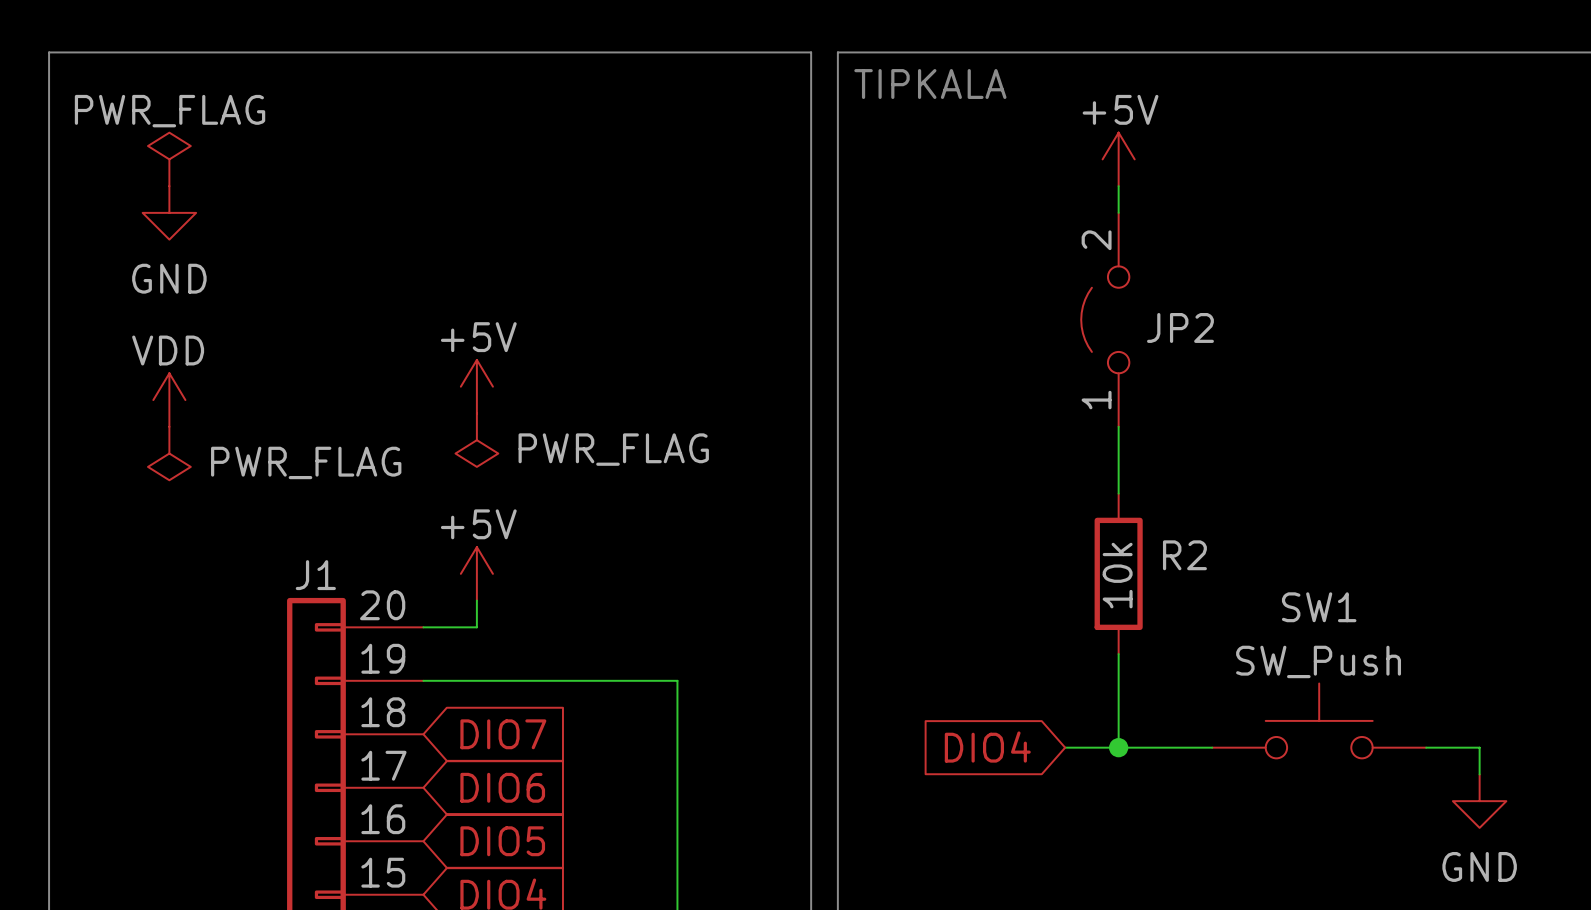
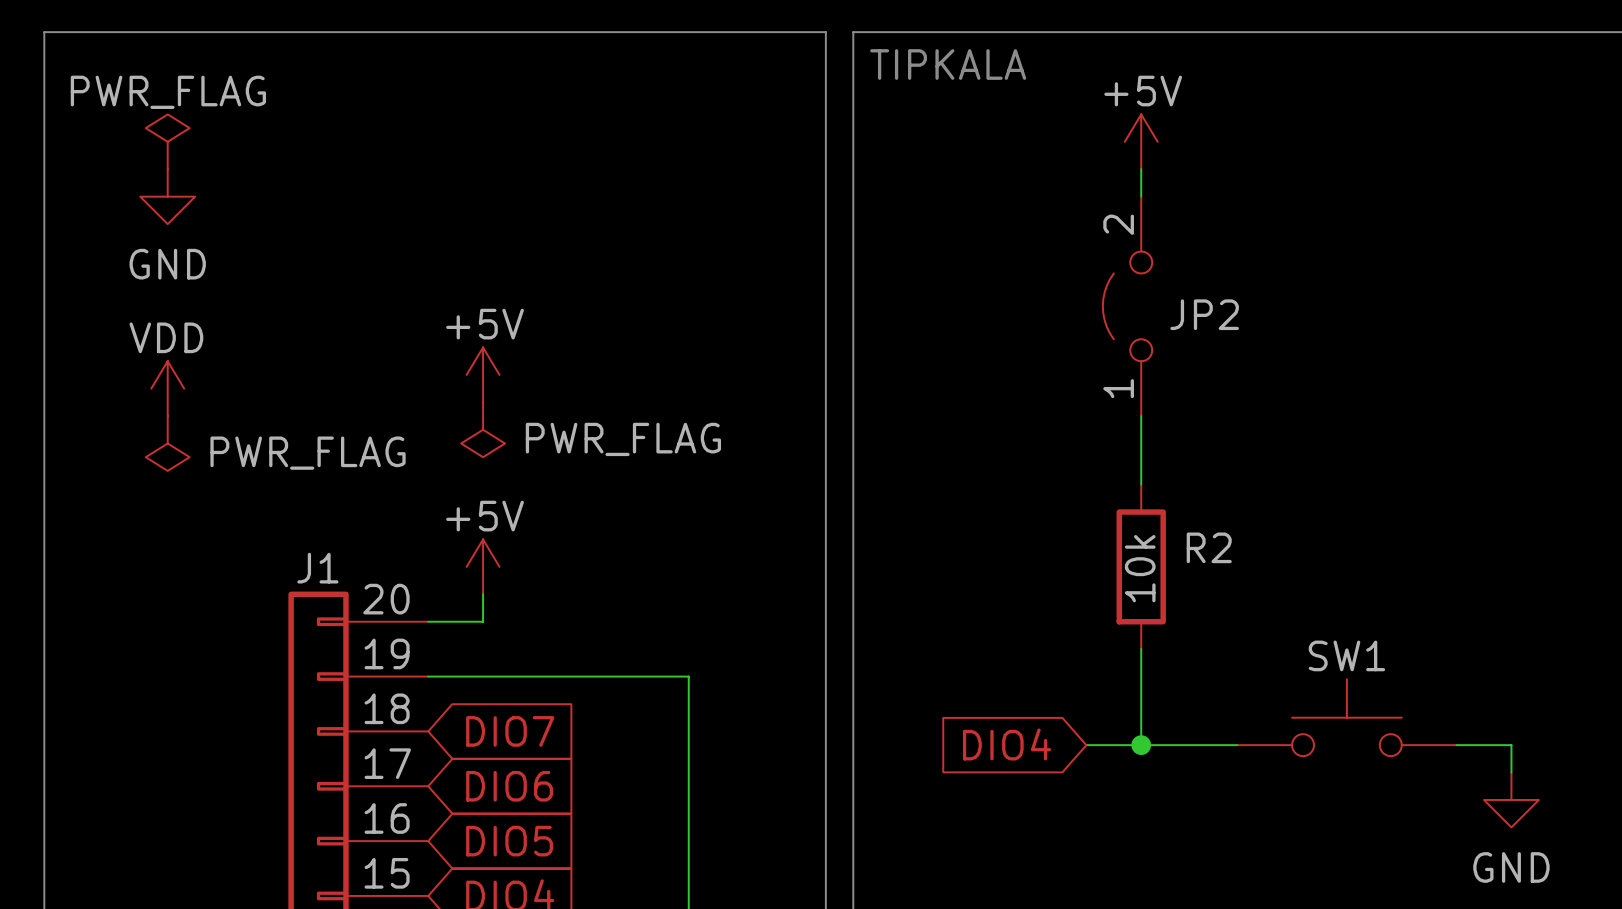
SW1 name position: SW1 (1319, 607) -> SW1 (1346, 655)
SW1 value: SW_Push (1318, 661) -> none

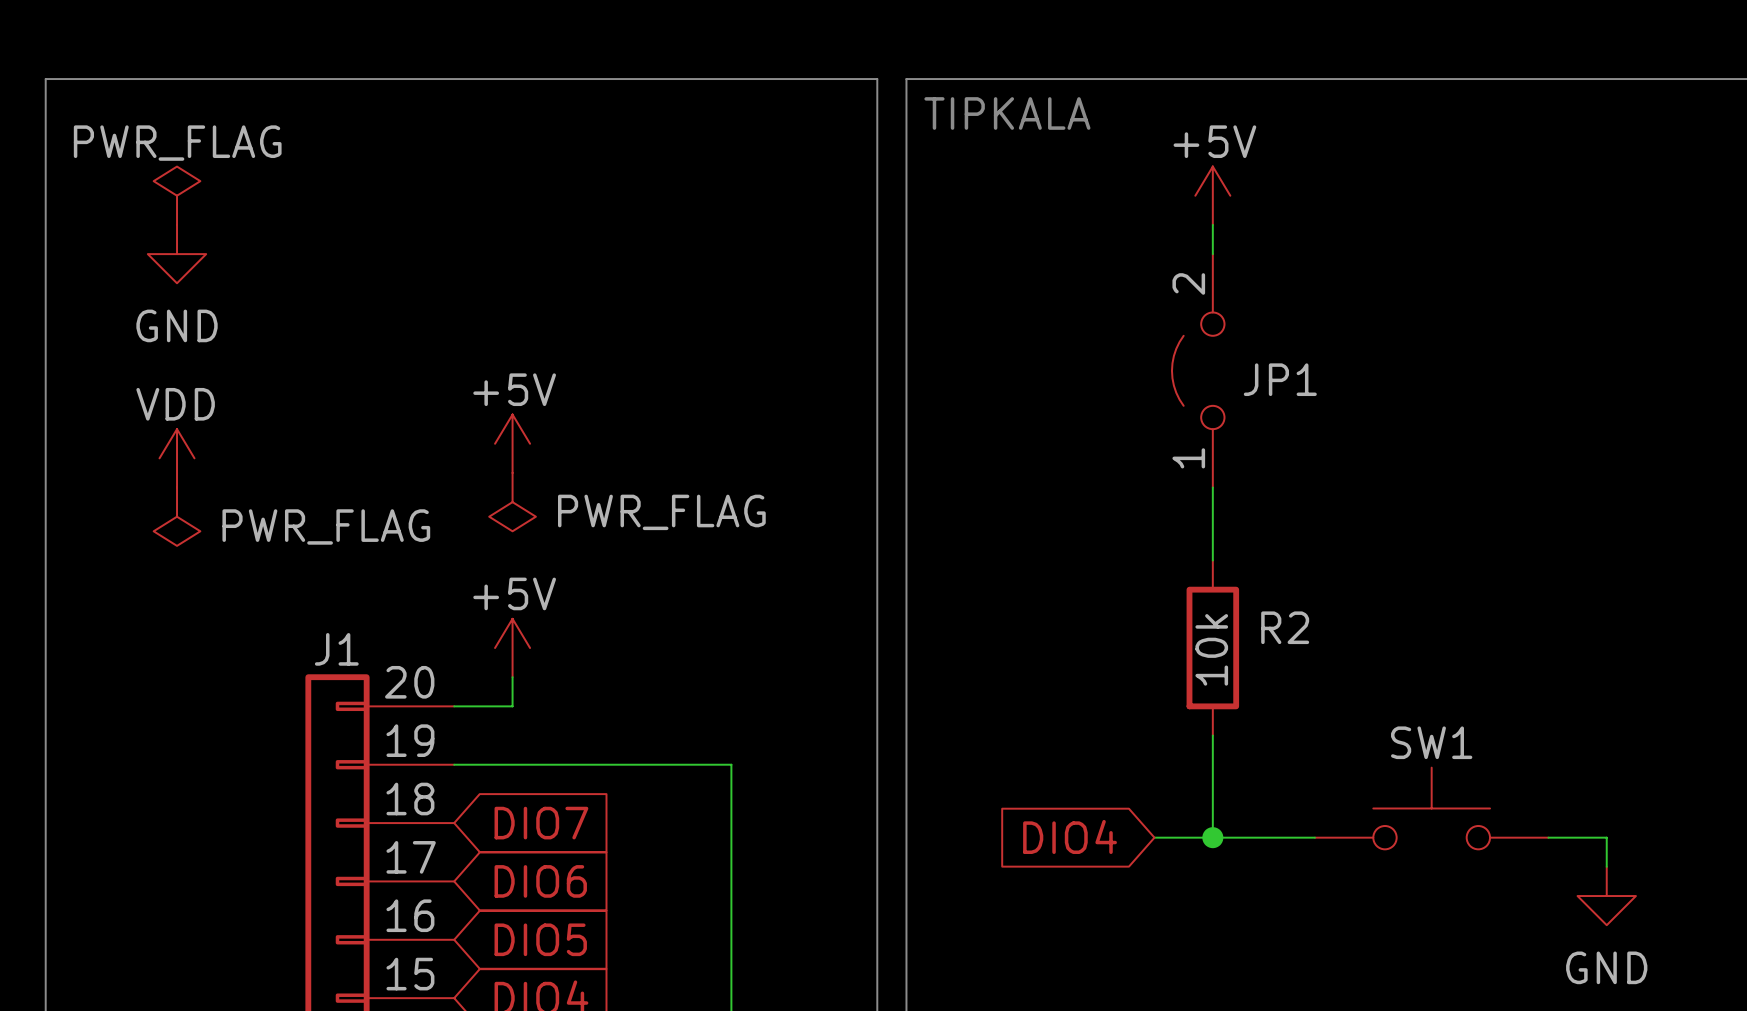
JP2 name: JP2 (1204, 314) -> JP1 (1280, 379)

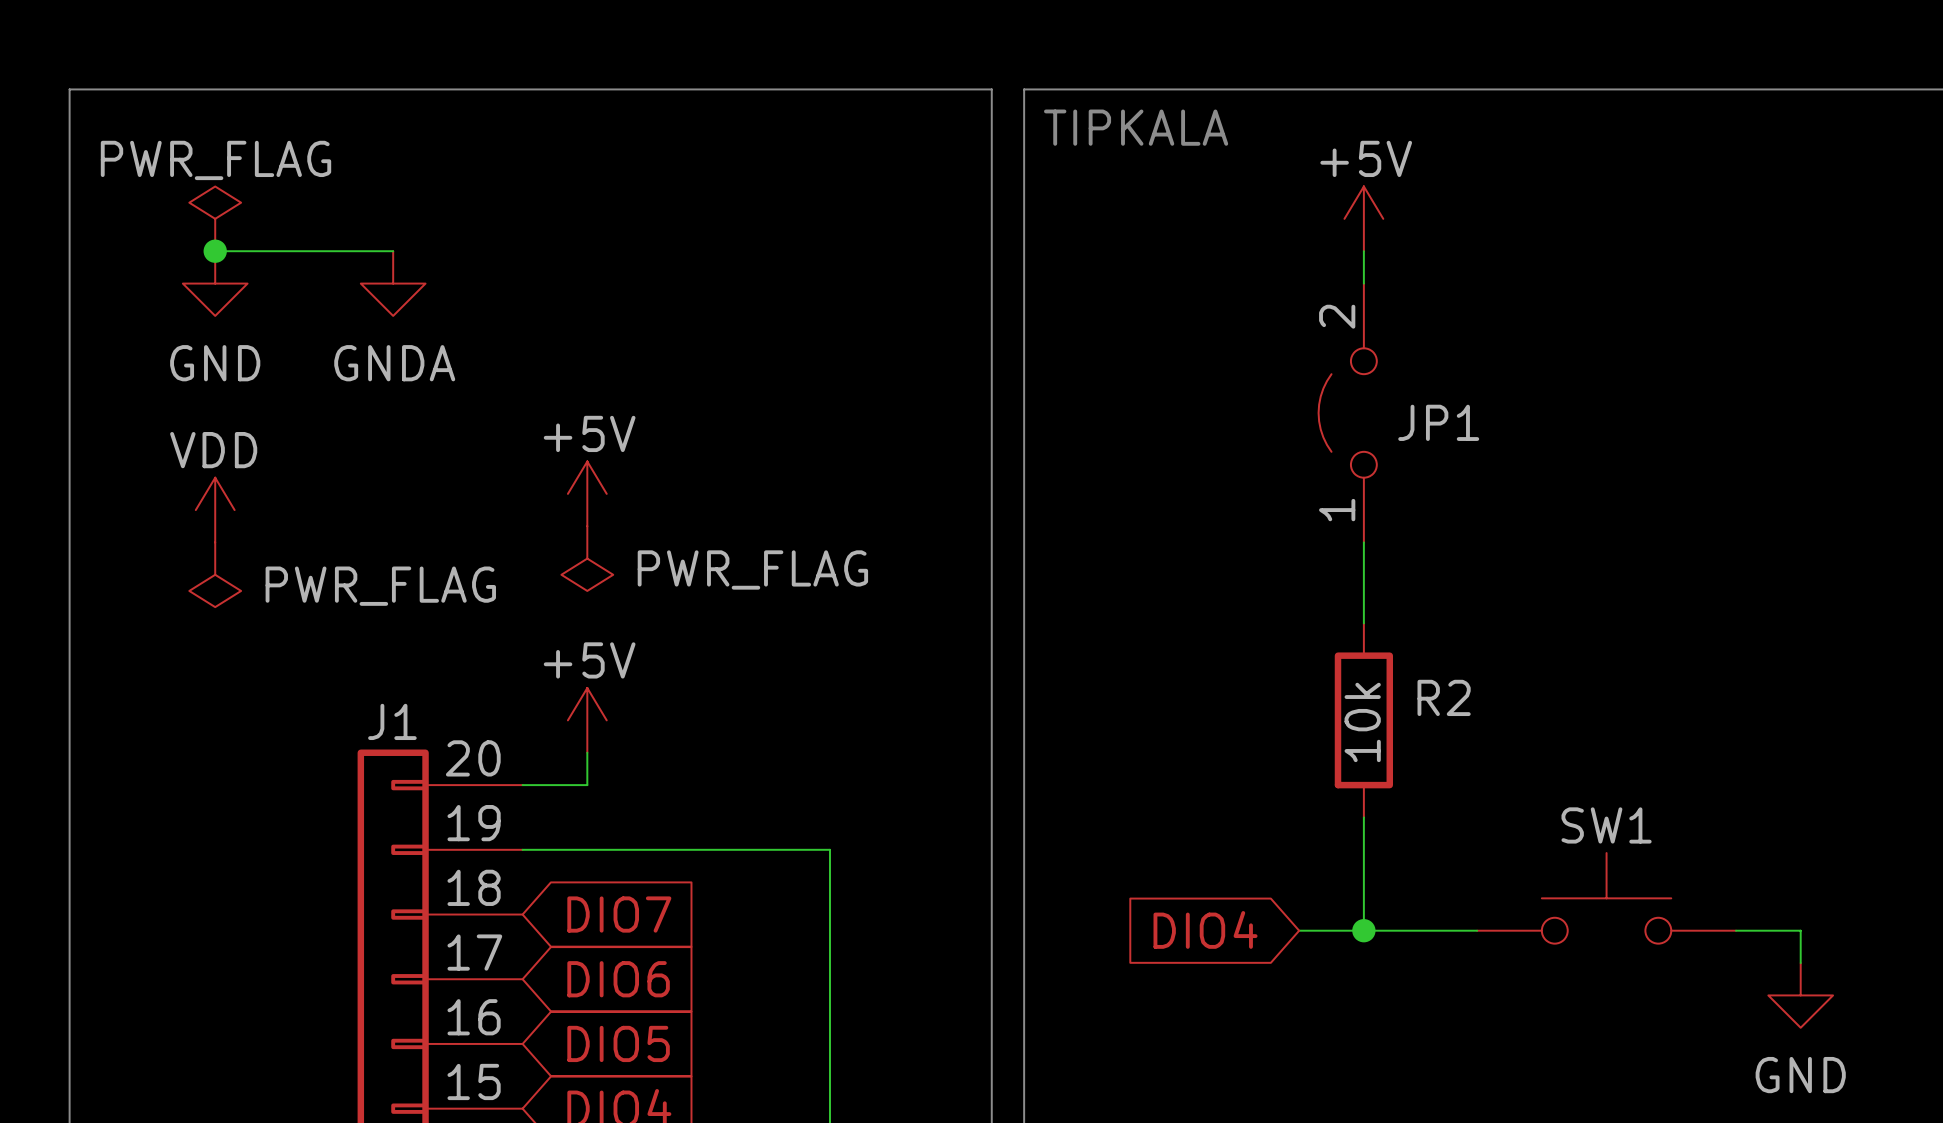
wire: none -> (215, 251) (393, 251)
junction: none -> (215, 251)
power symbol: none -> GNDA (393, 283)

